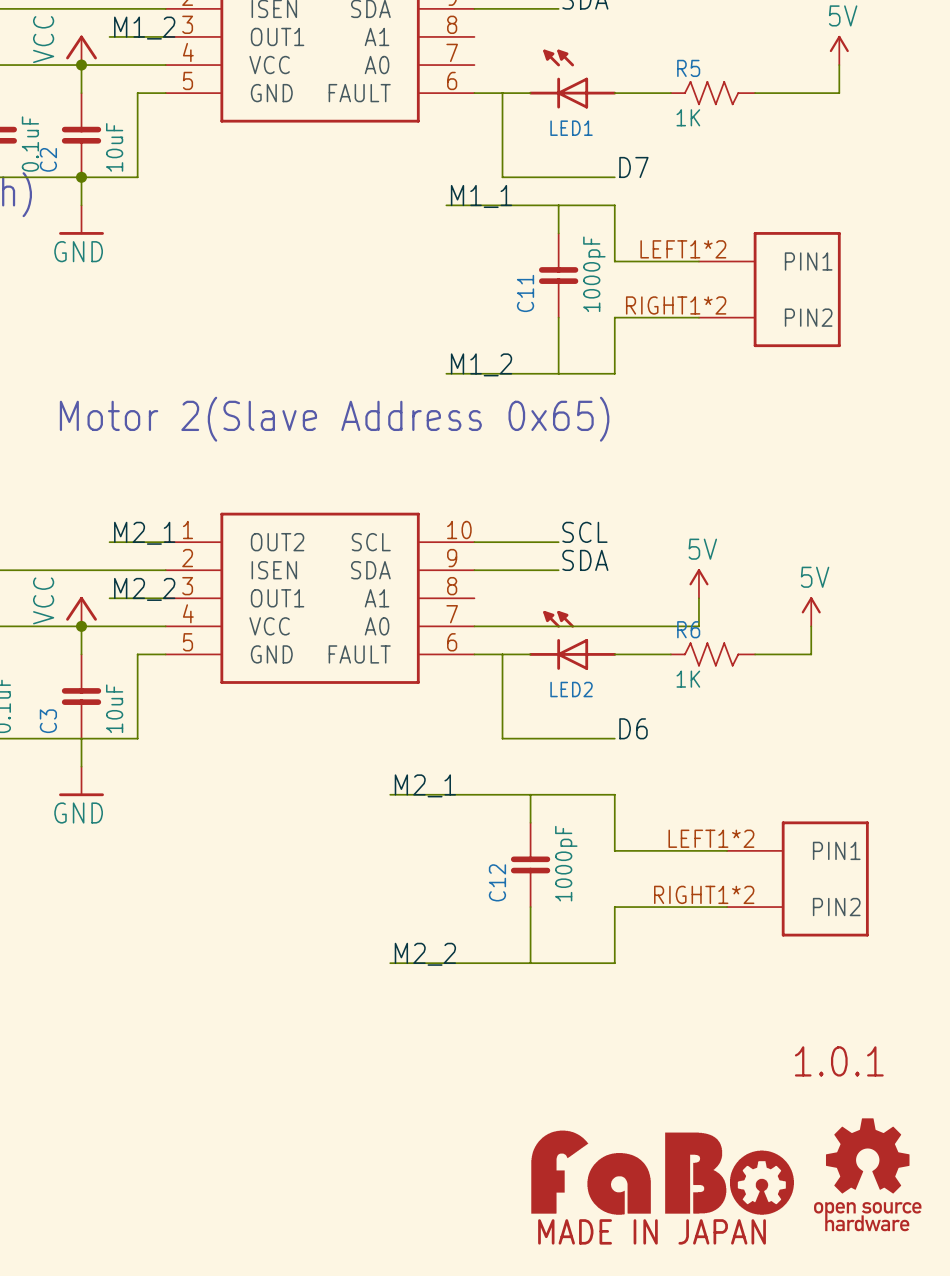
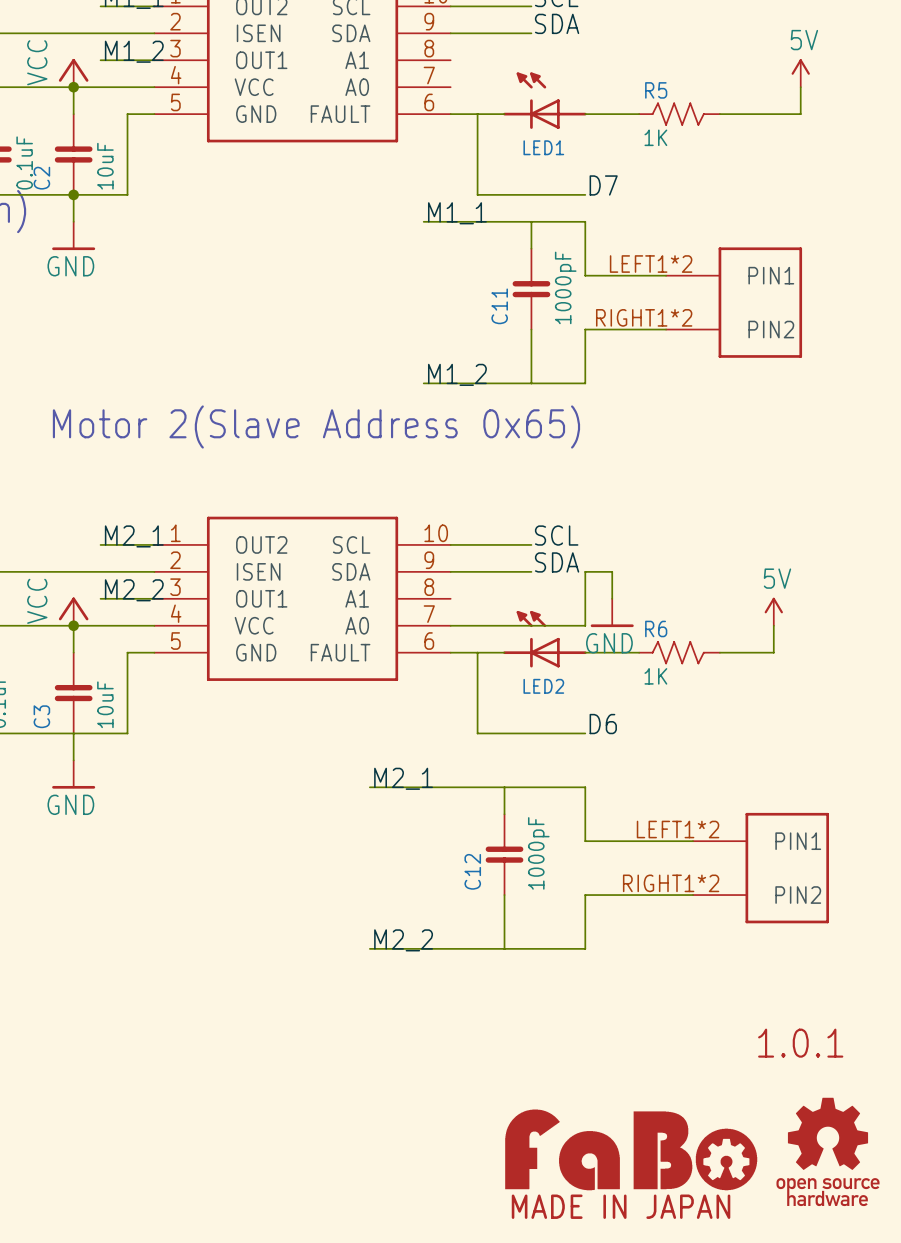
power symbol: 5V (698, 583) -> none
wire: (698, 598) (698, 626) (614, 626) -> (612, 598) (612, 571) (585, 571) (585, 625)
power symbol: none -> GND (612, 612)

